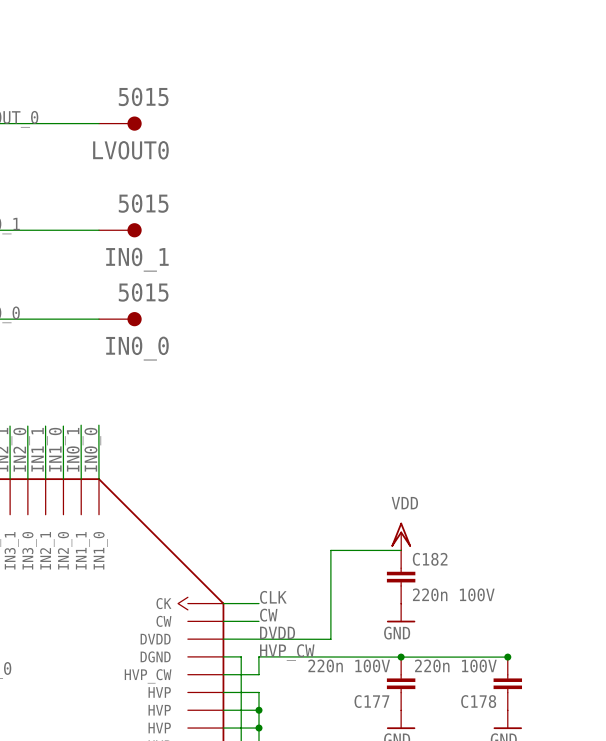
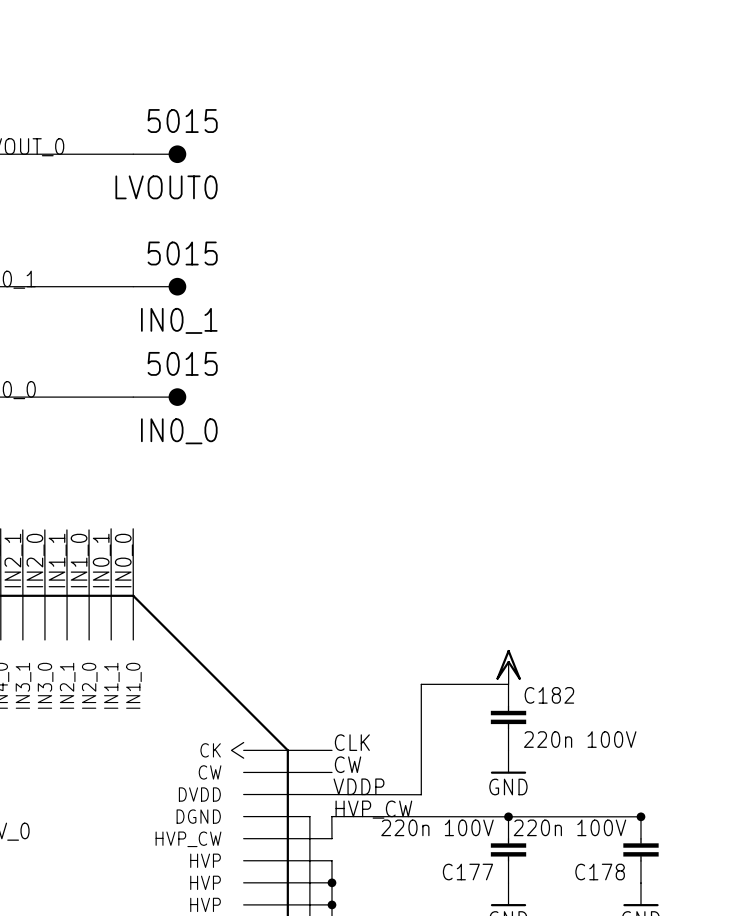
power symbol text: VDD (404, 503) -> none
label: DVDD (277, 632) -> VDDP (358, 786)

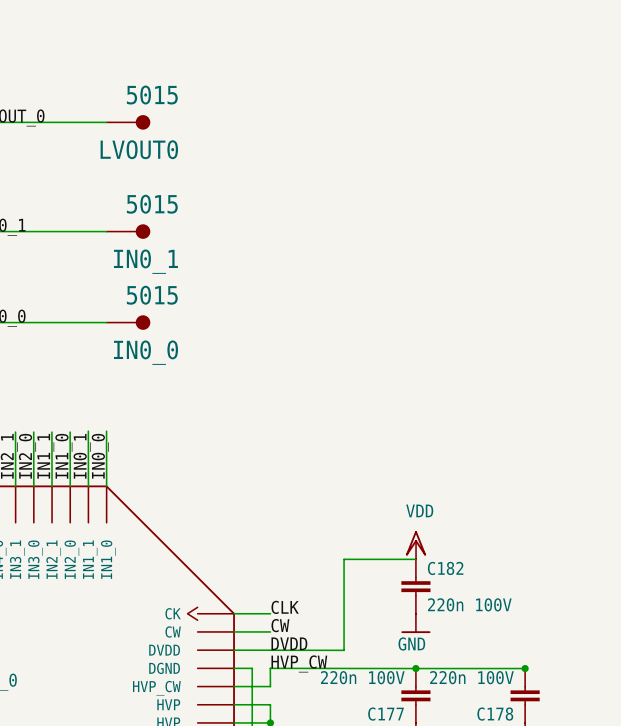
power symbol text: none -> VDD (419, 510)
label: VDDP (358, 786) -> DVDD (289, 643)

